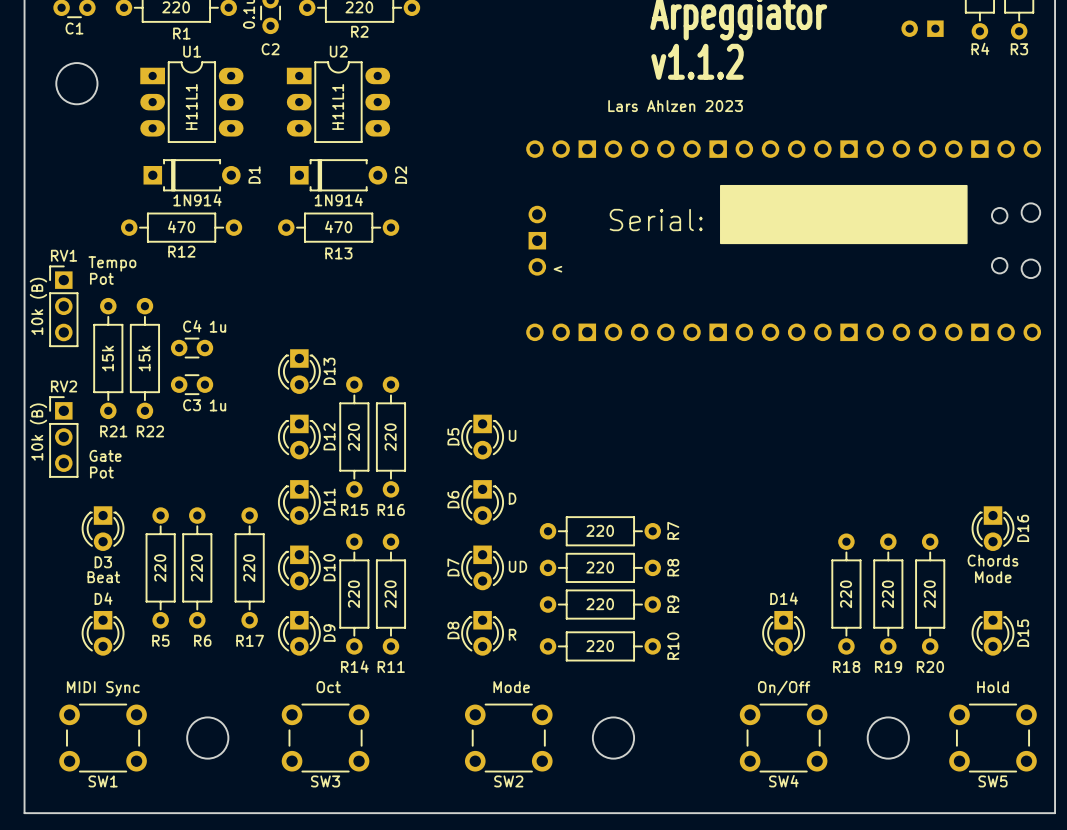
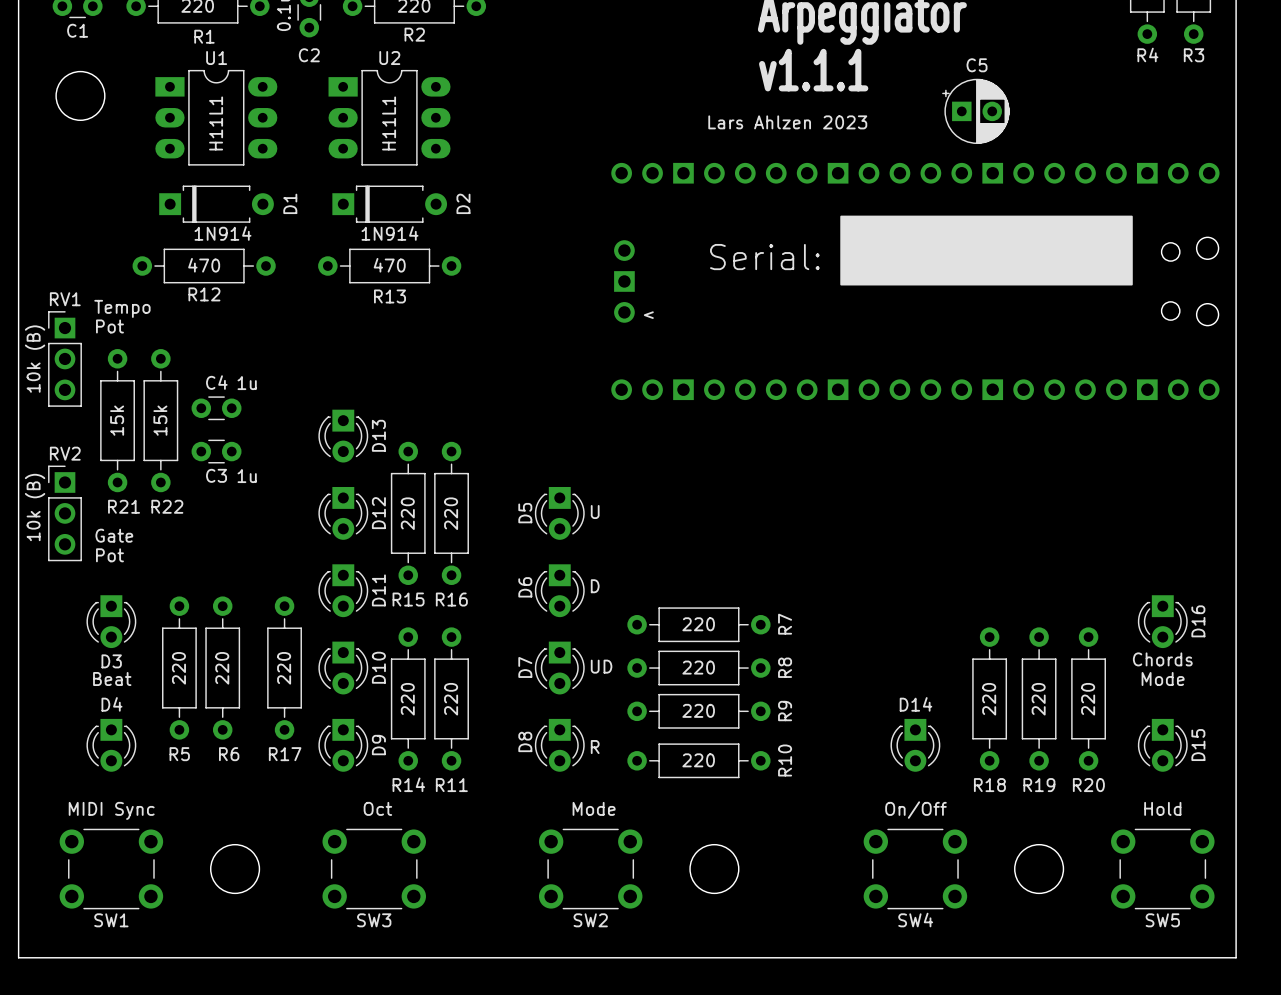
C5 side: bottom (922, 28) -> top (975, 111)
text: v1.1.2 (697, 61) -> v1.1.1 (813, 70)

